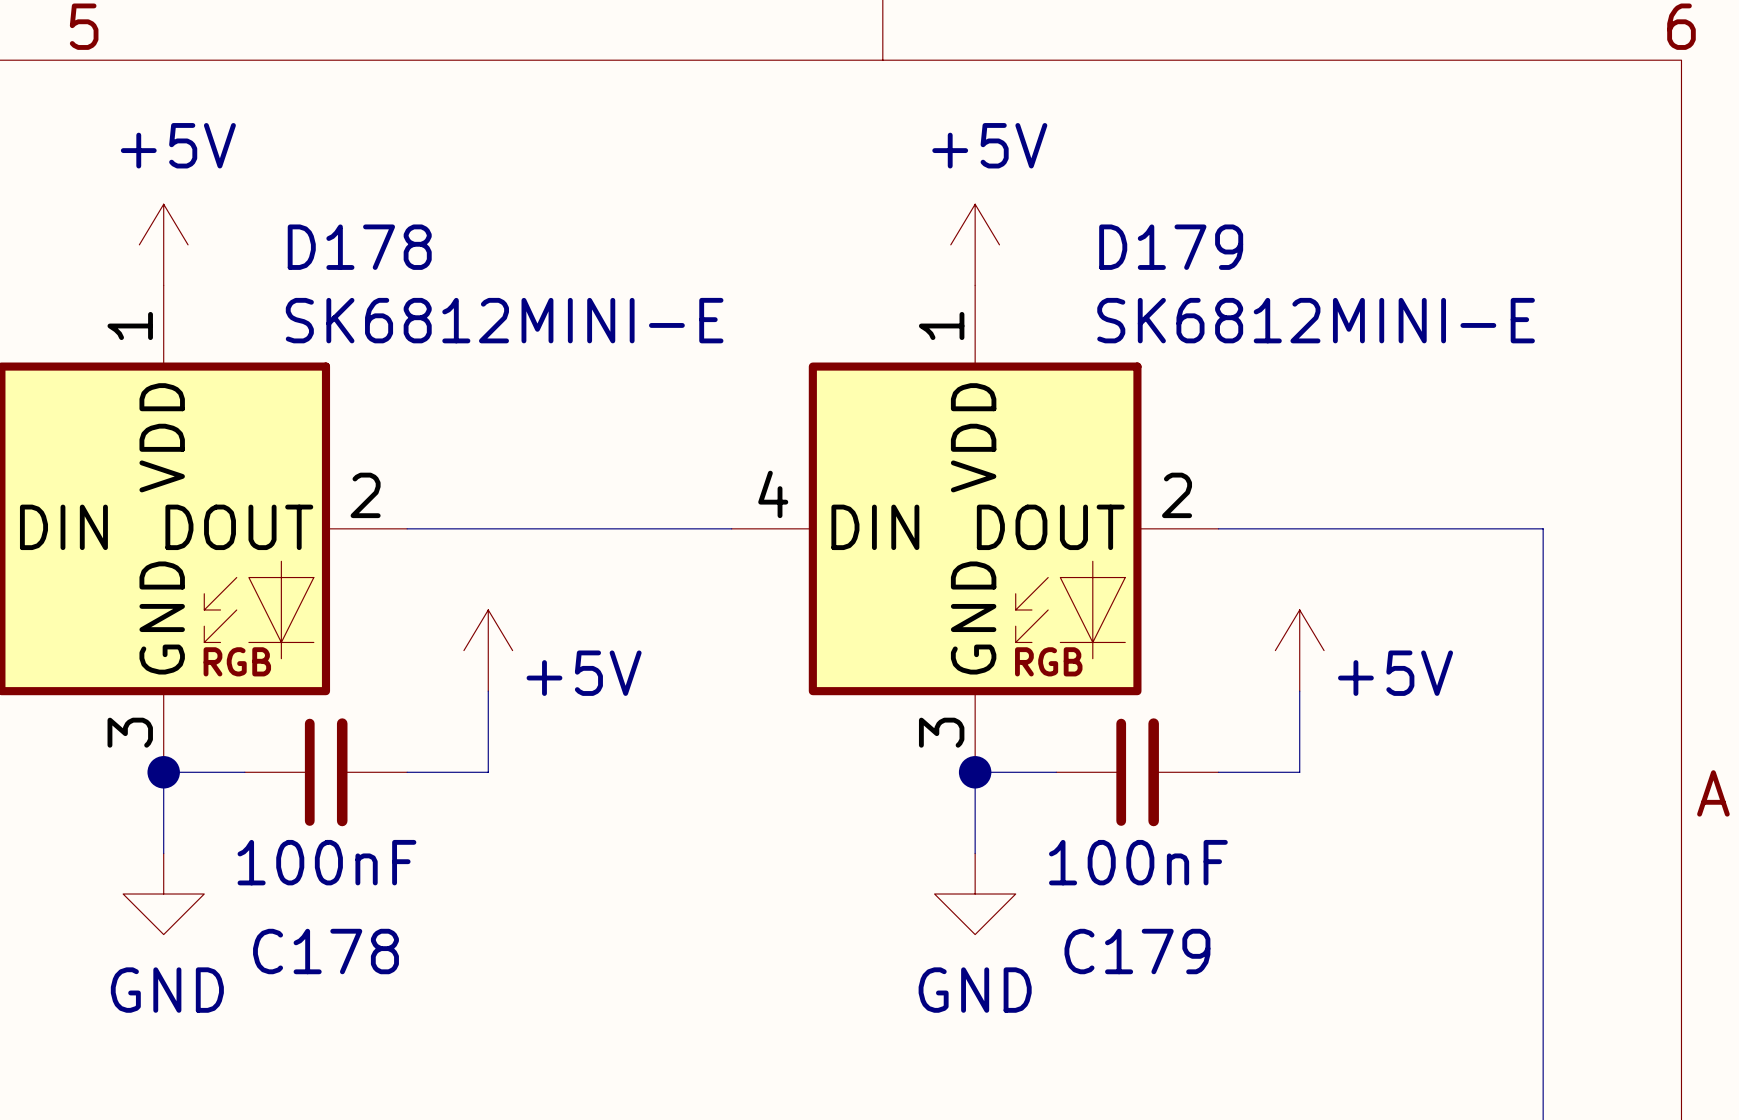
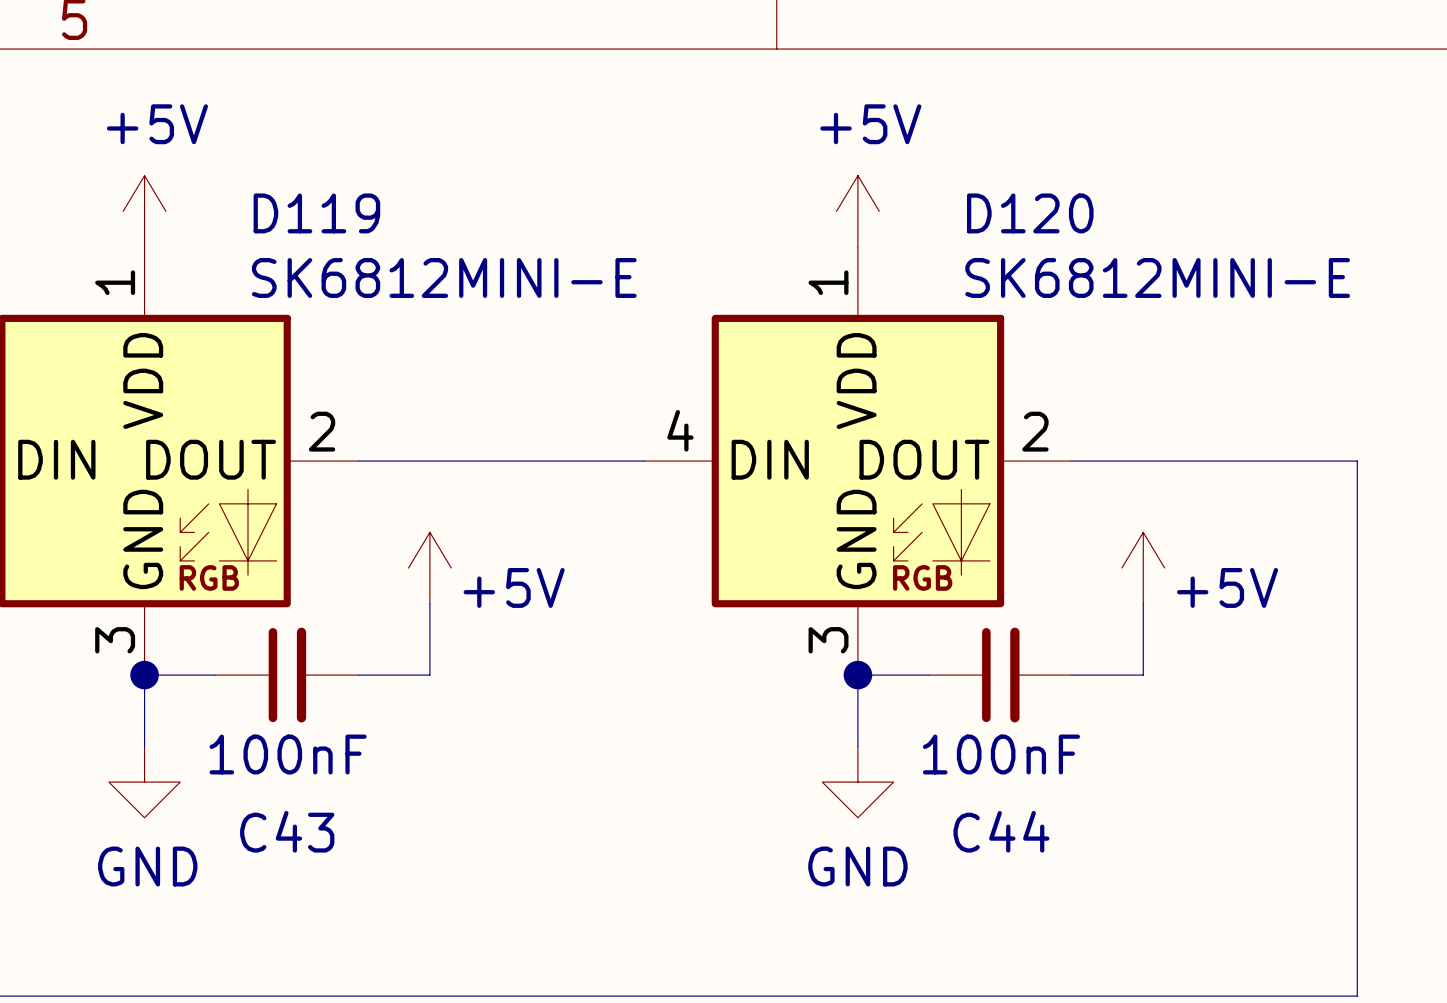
D178 name: D178 (359, 247) -> D119 (316, 213)
D179 name: D179 (1171, 247) -> D120 (1030, 213)
C178 name: C178 (325, 951) -> C43 (287, 831)
C179 name: C179 (1137, 951) -> C44 (1001, 831)

